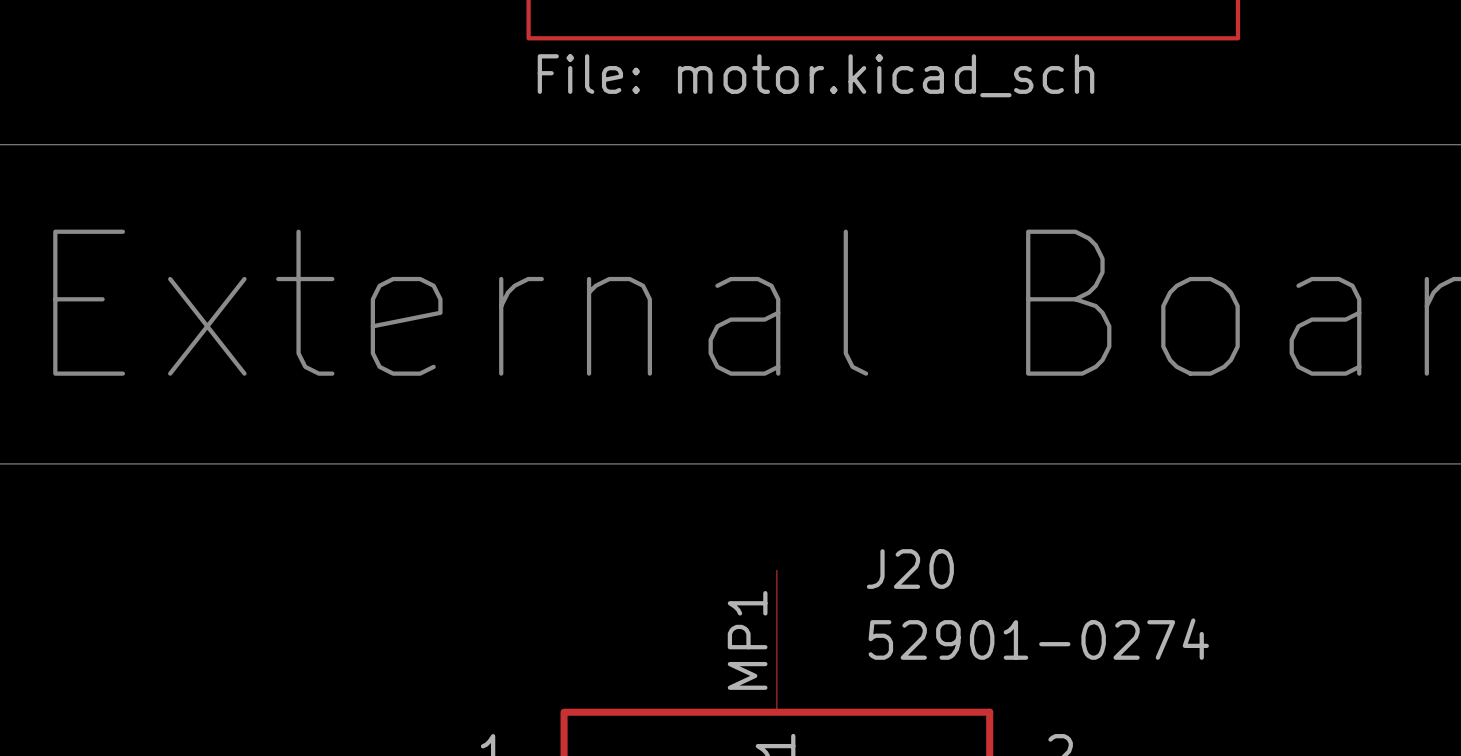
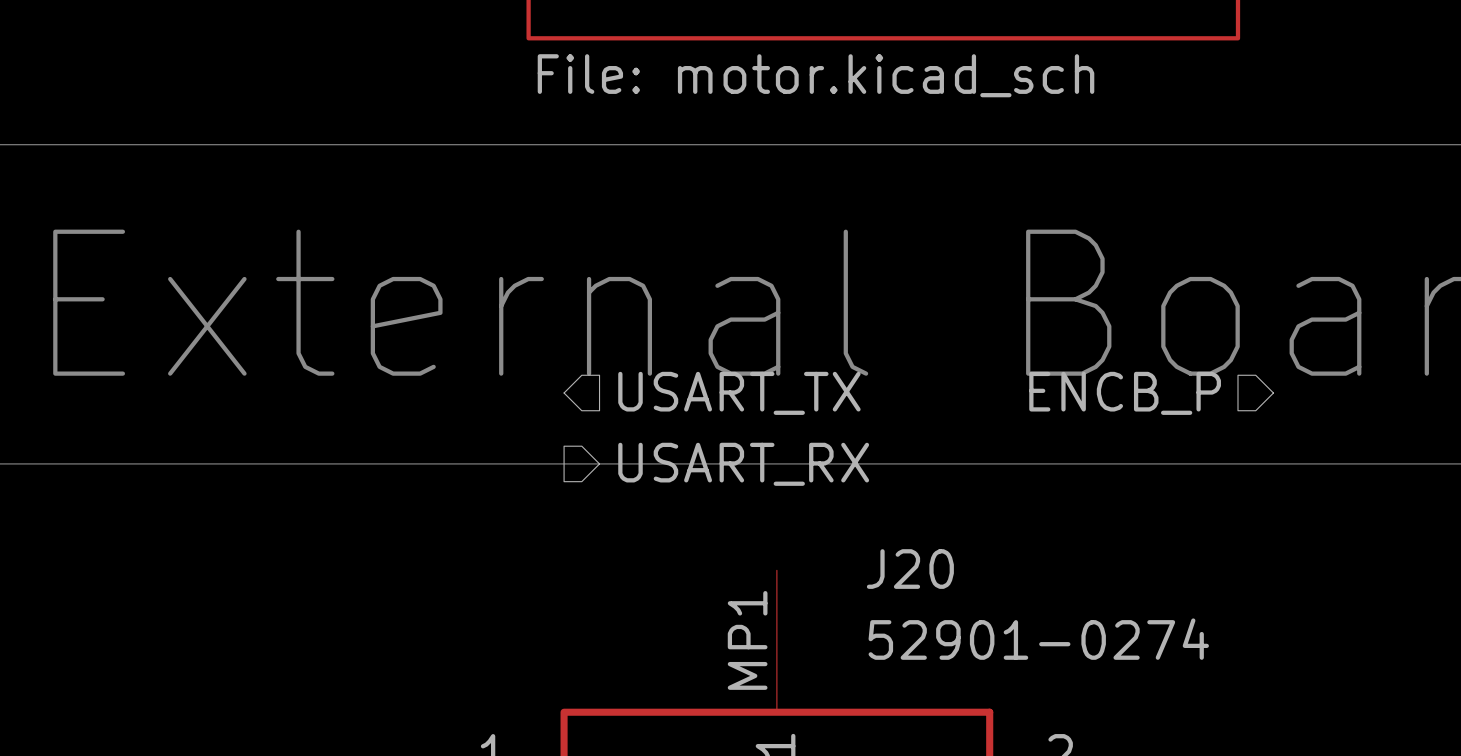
sheet pin: none -> USART_TX (739, 393)
sheet pin: none -> ENCB_P (1125, 393)
sheet pin: none -> USART_RX (743, 464)

